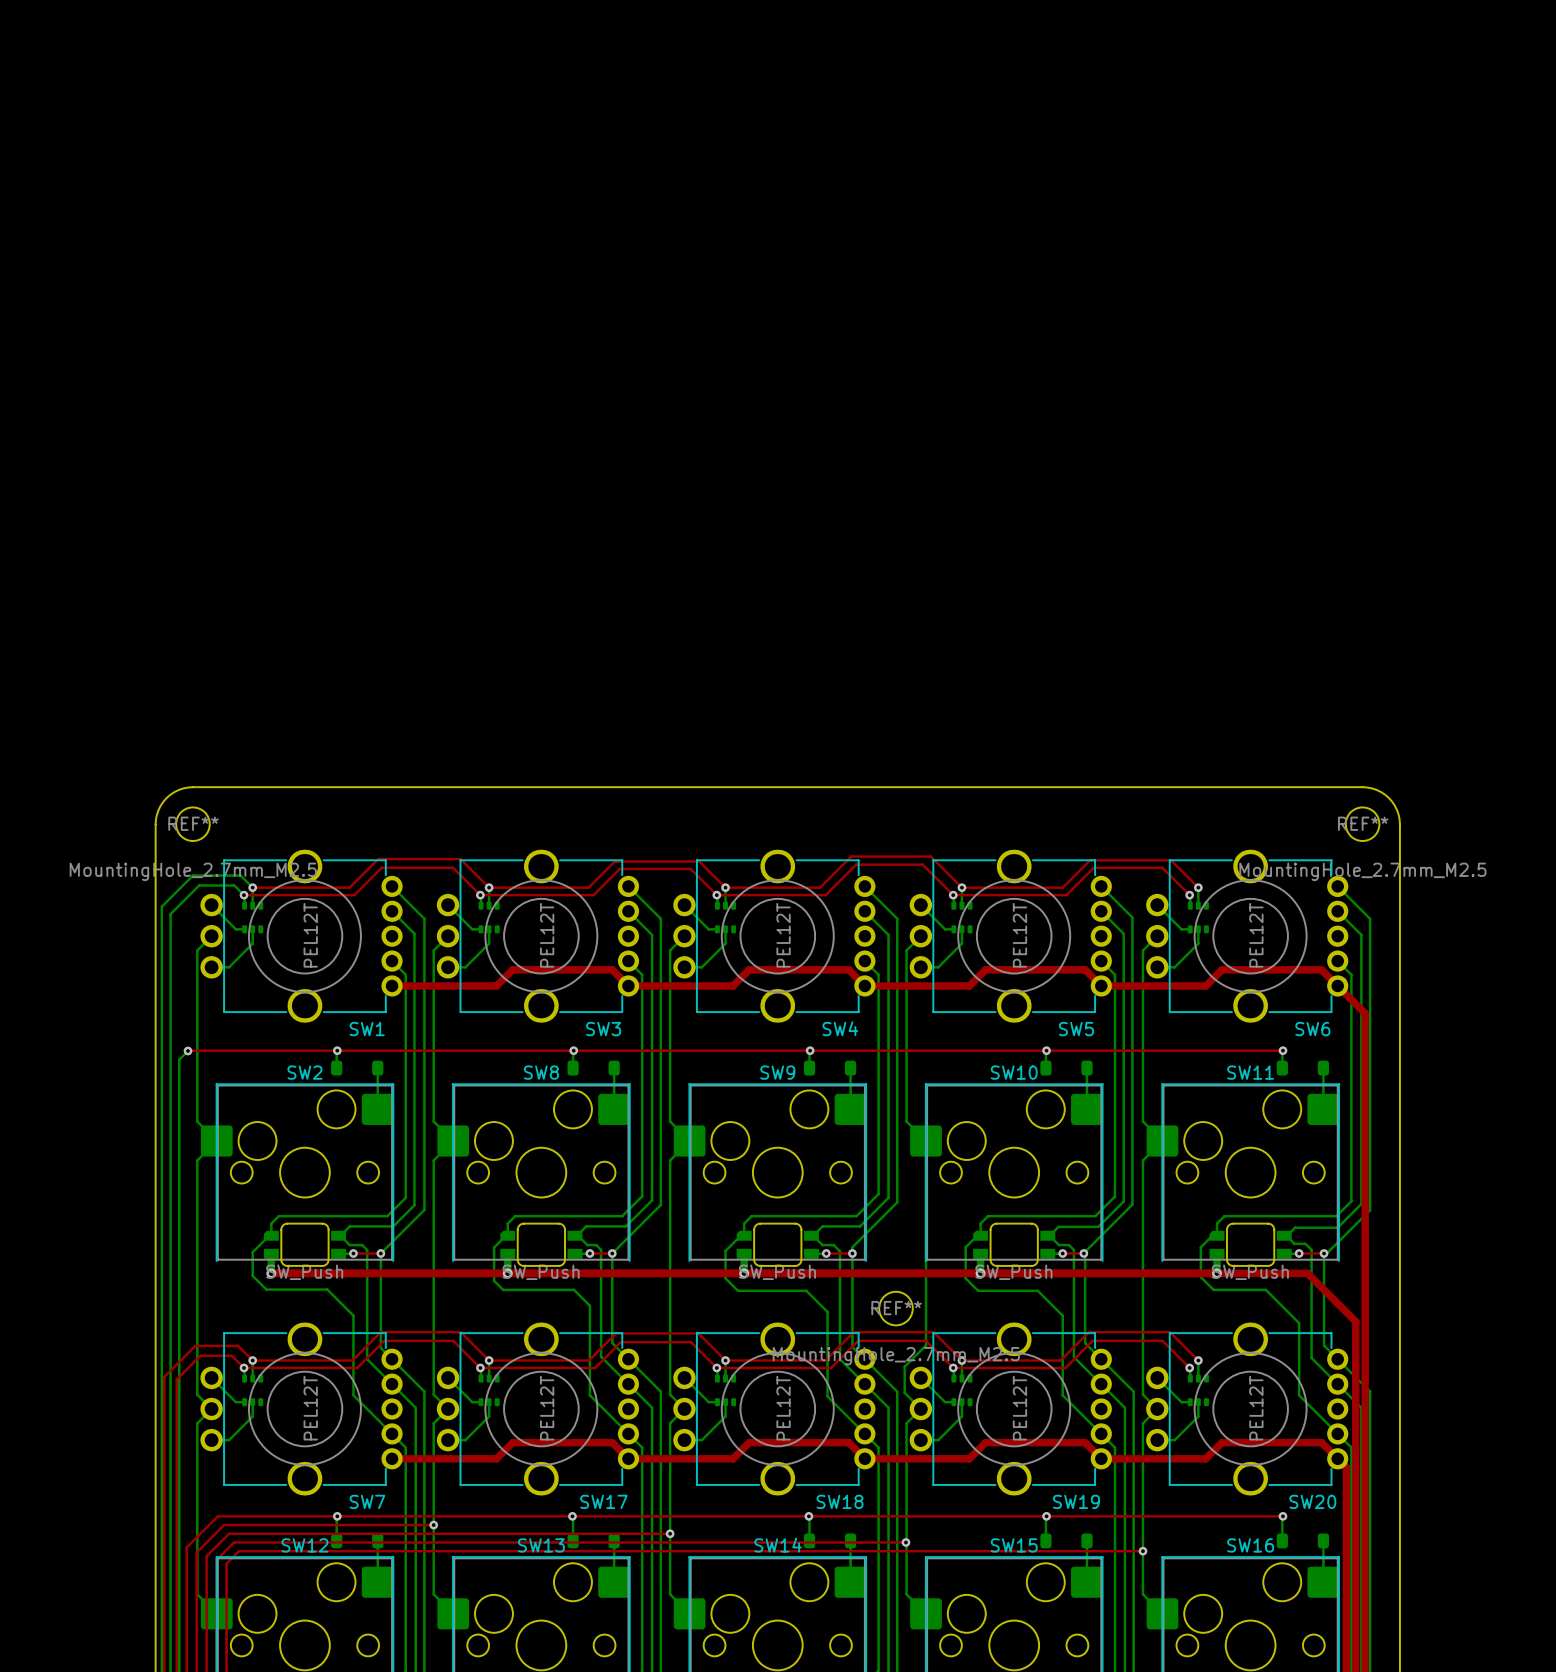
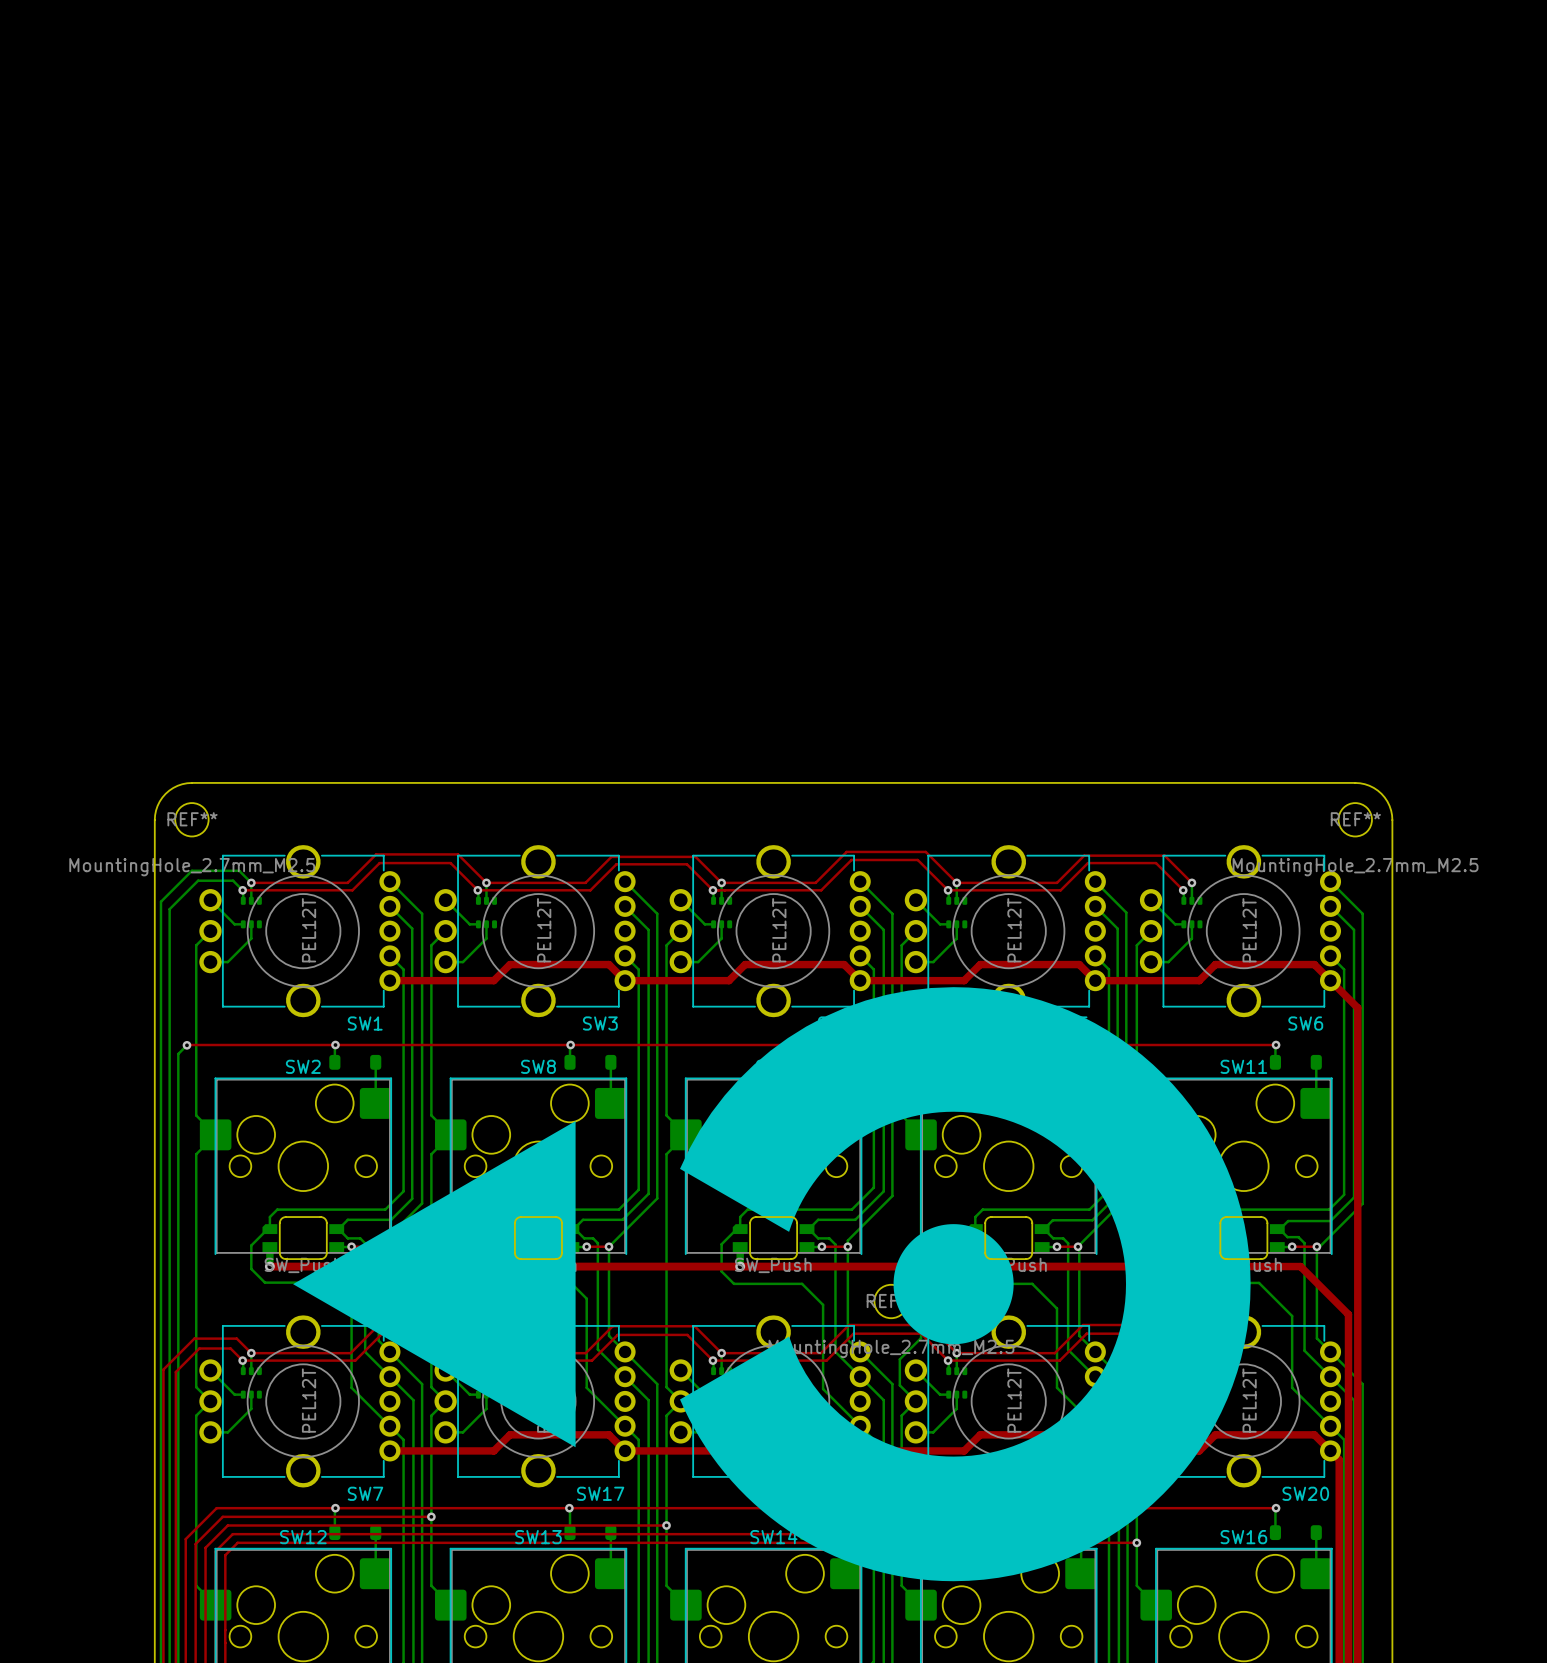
drawing: none -> [680, 987, 1251, 1582]
drawing: none -> [293, 1121, 576, 1448]

